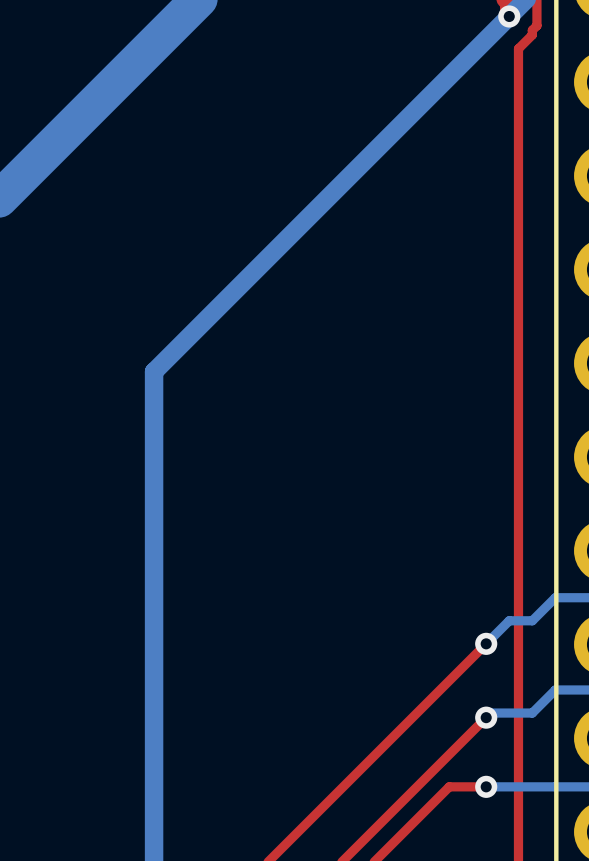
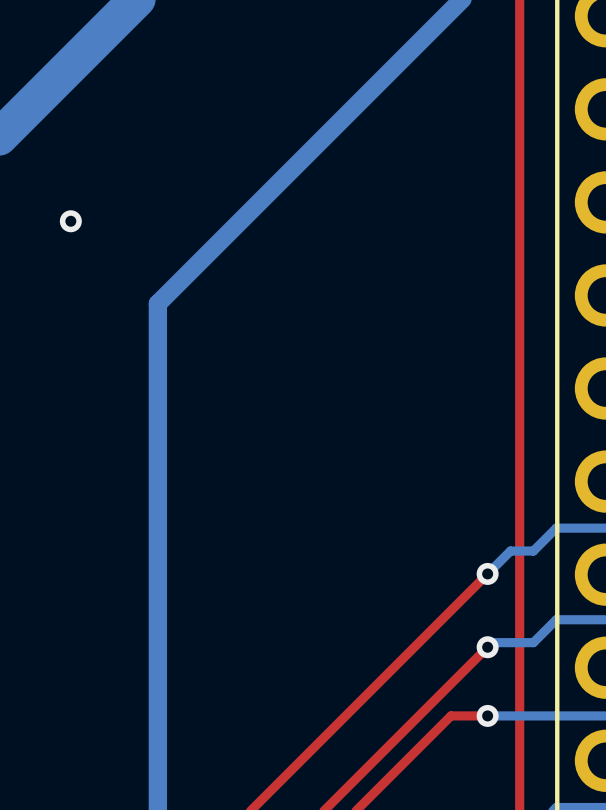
via: none -> (70, 221)

